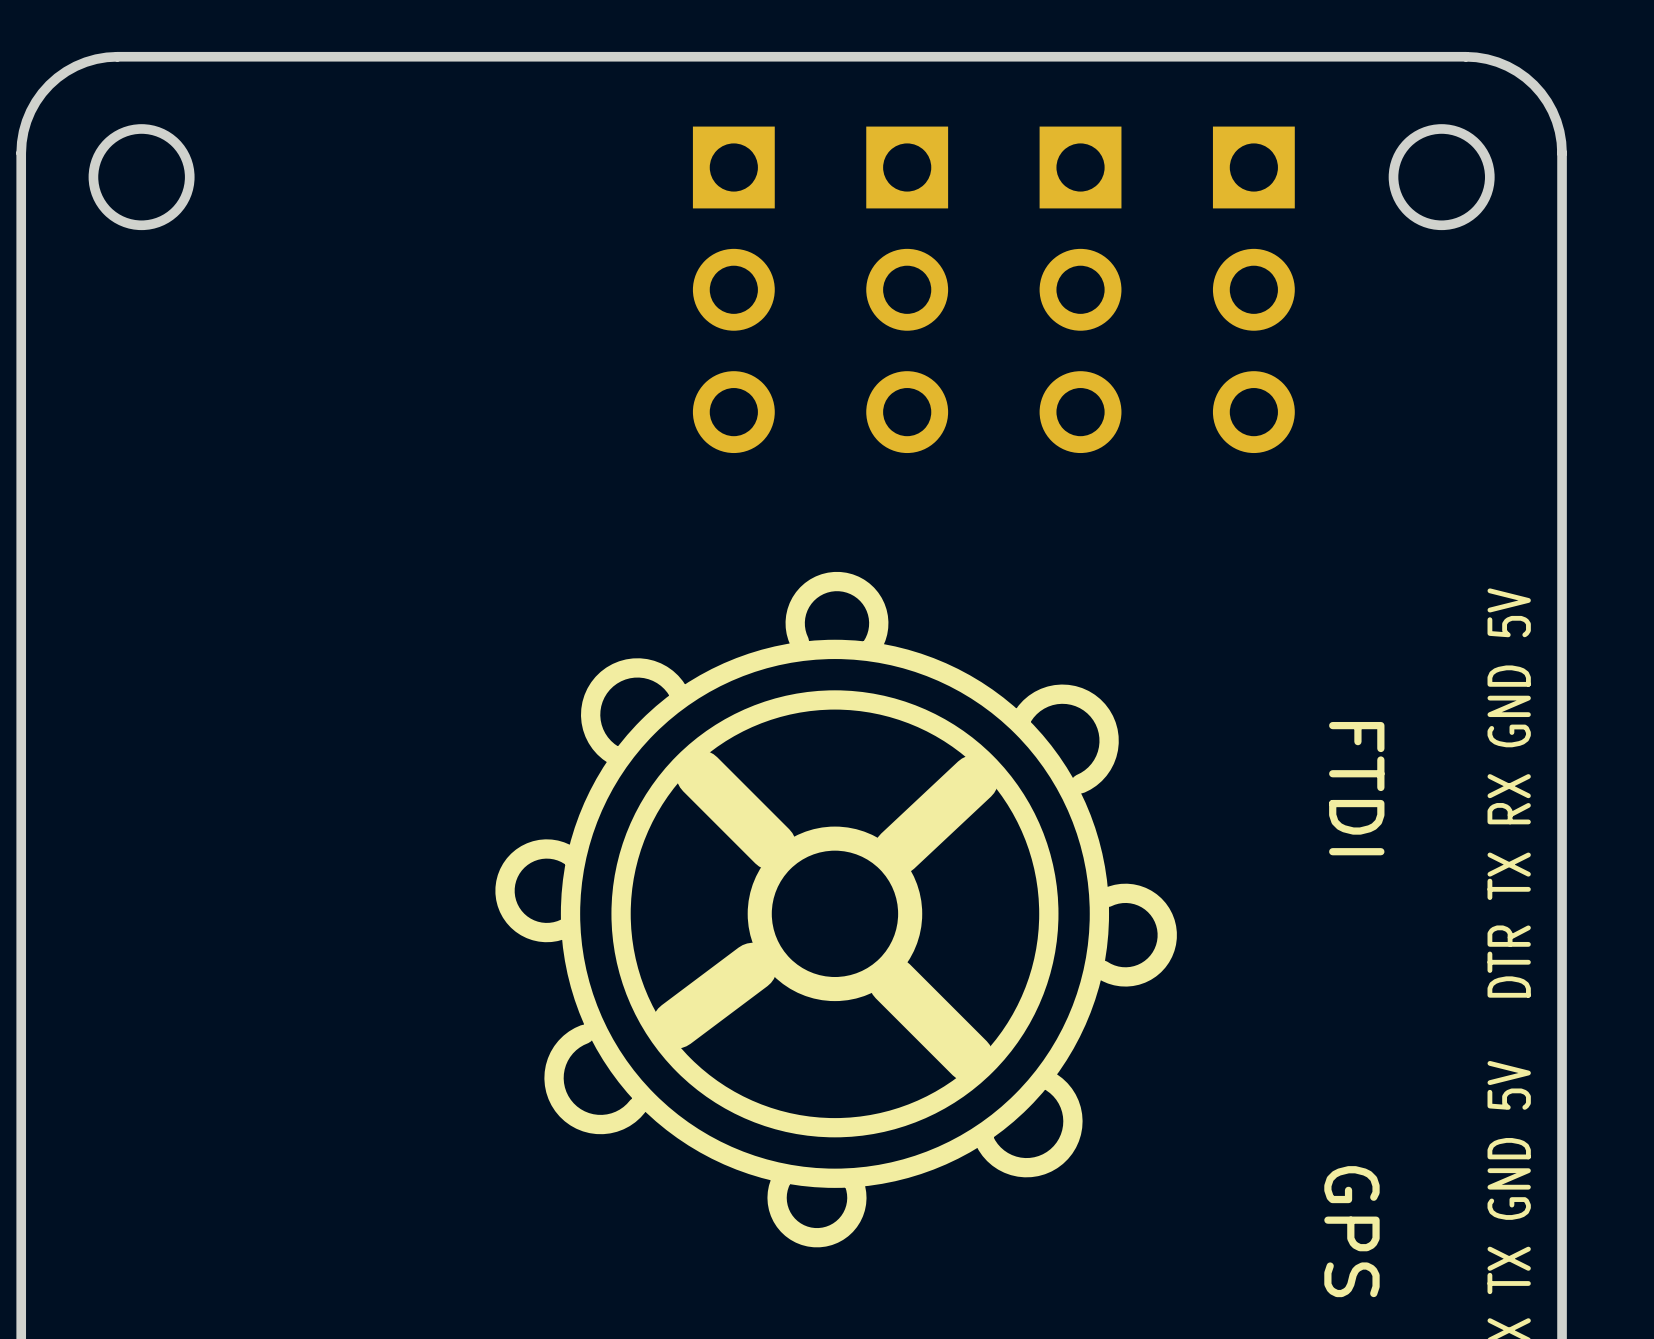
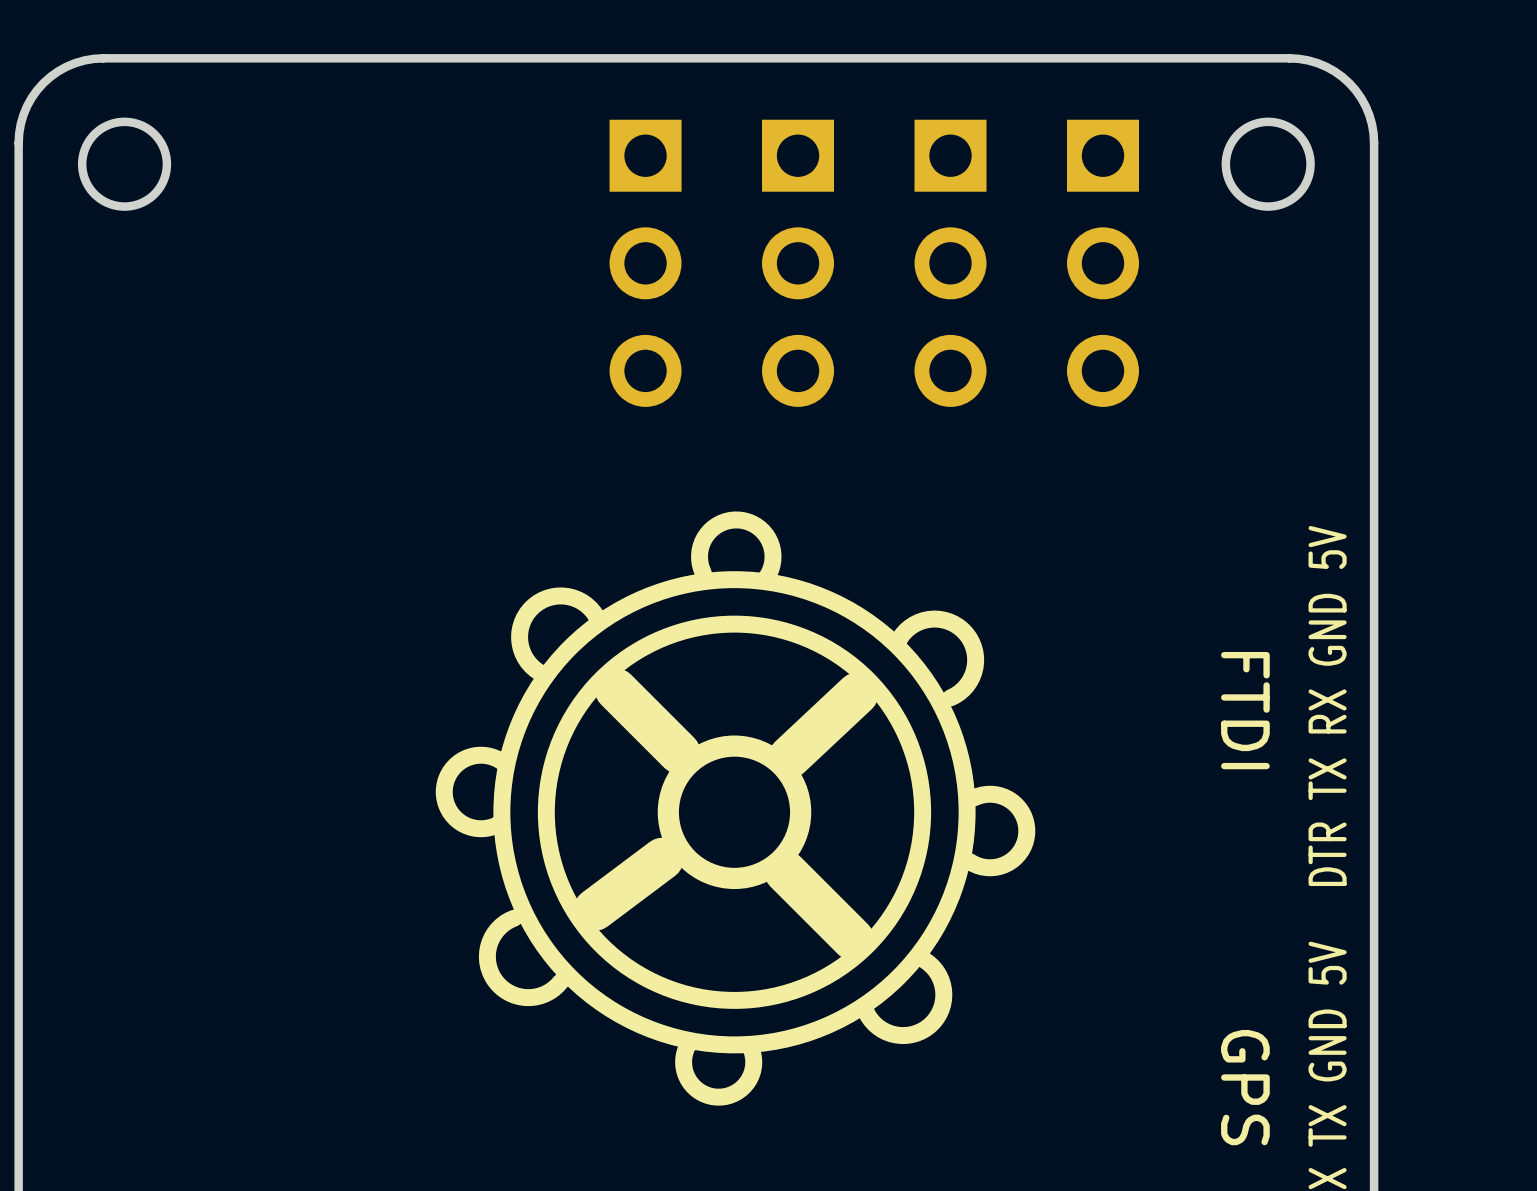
part position: (1356, 788) -> (1245, 710)
part position: (1351, 1231) -> (1245, 1087)

